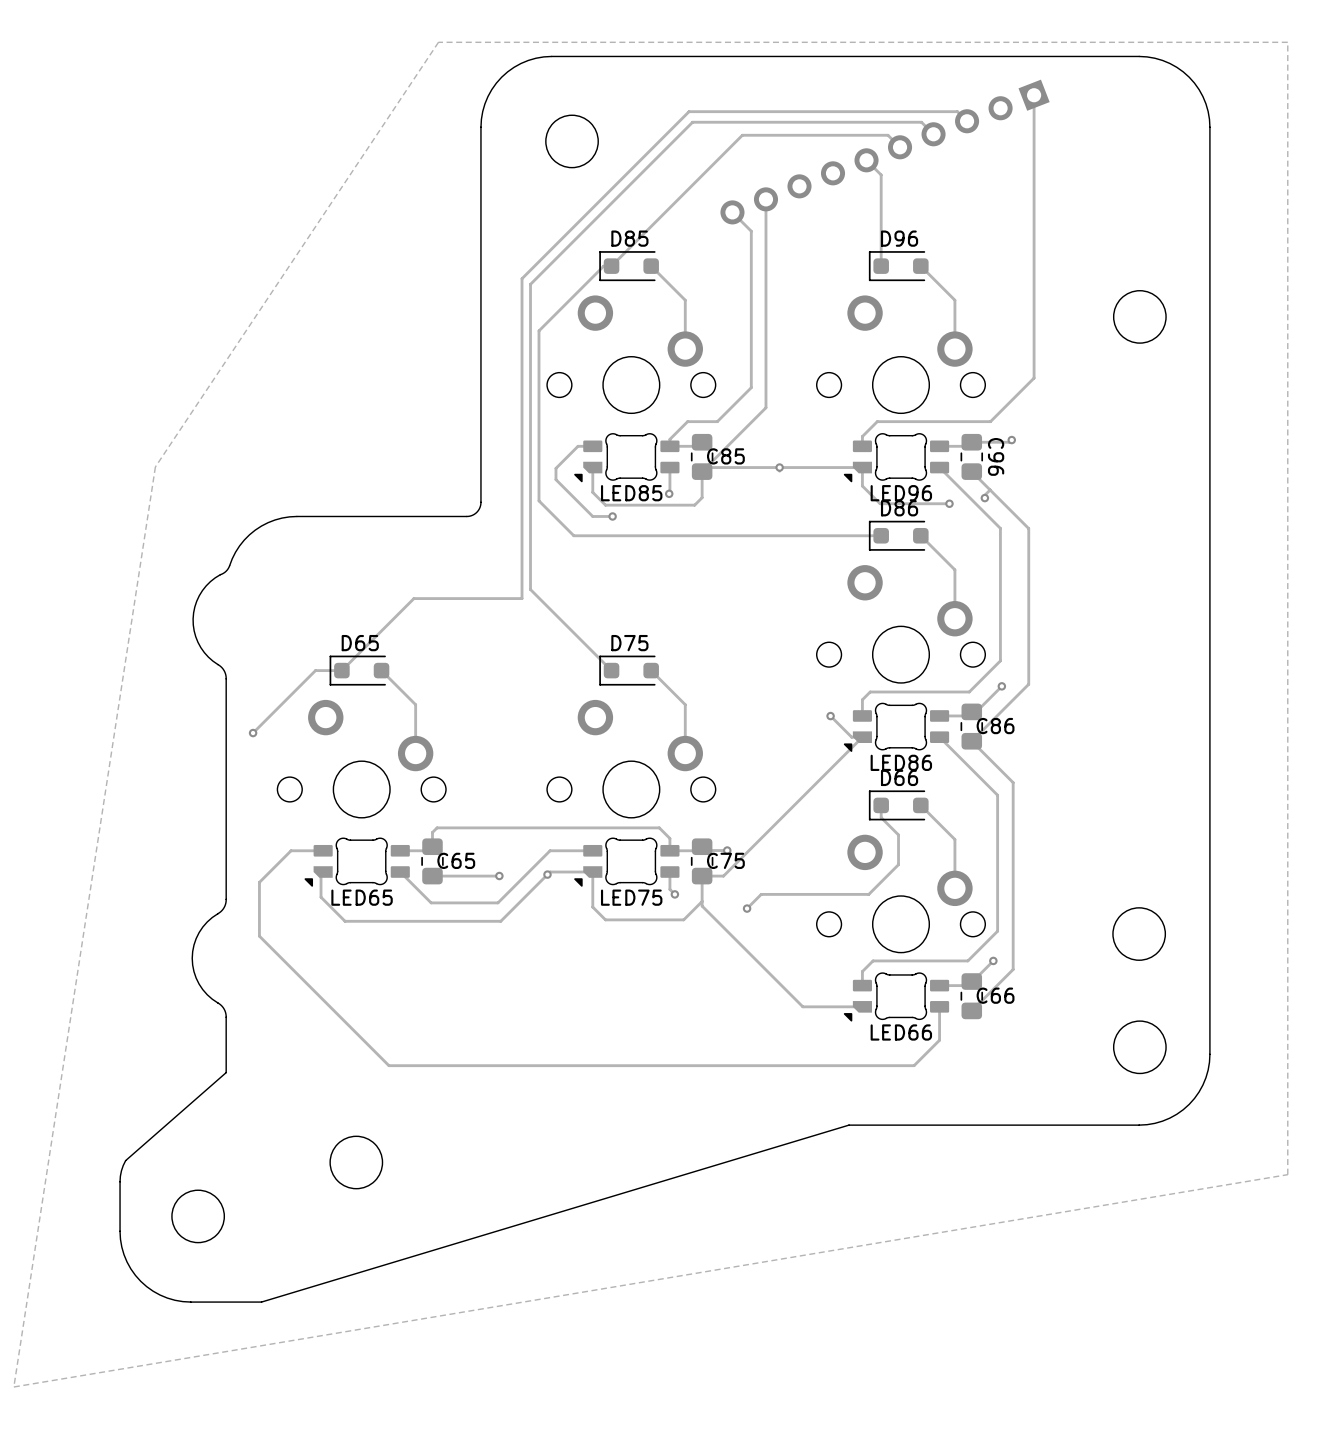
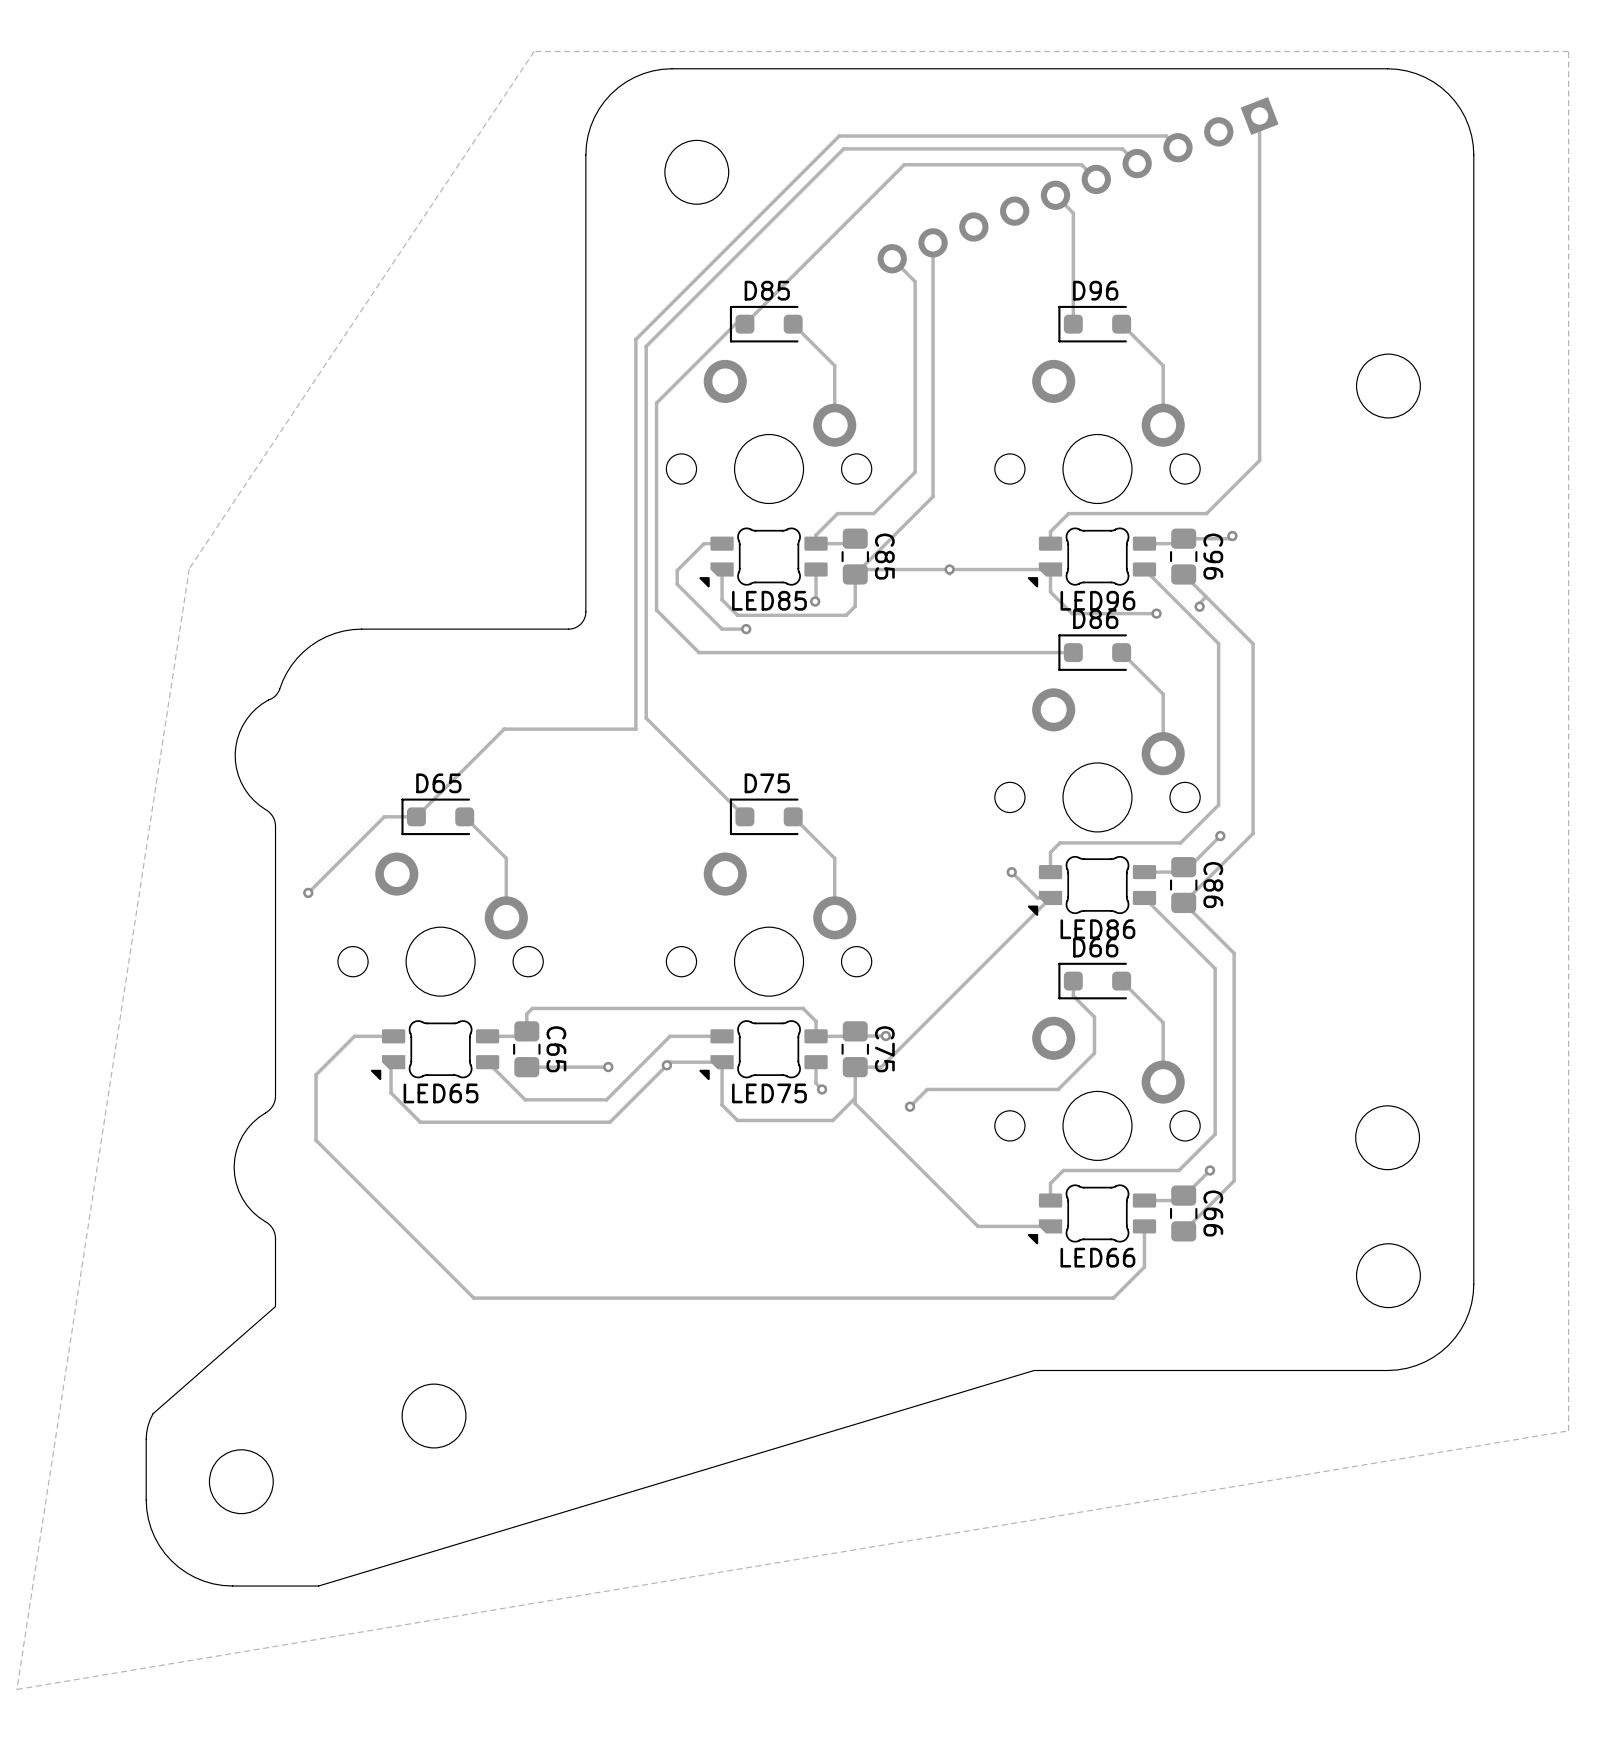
C85 name rotation: 0° (725, 456) -> 90° clockwise (884, 556)
C86 name rotation: 0° (995, 726) -> 90° clockwise (1213, 885)
C65 name rotation: 0° (456, 860) -> 90° clockwise (556, 1049)
C75 name rotation: 0° (725, 860) -> 90° clockwise (884, 1049)
C66 name rotation: 0° (995, 995) -> 90° clockwise (1213, 1213)

